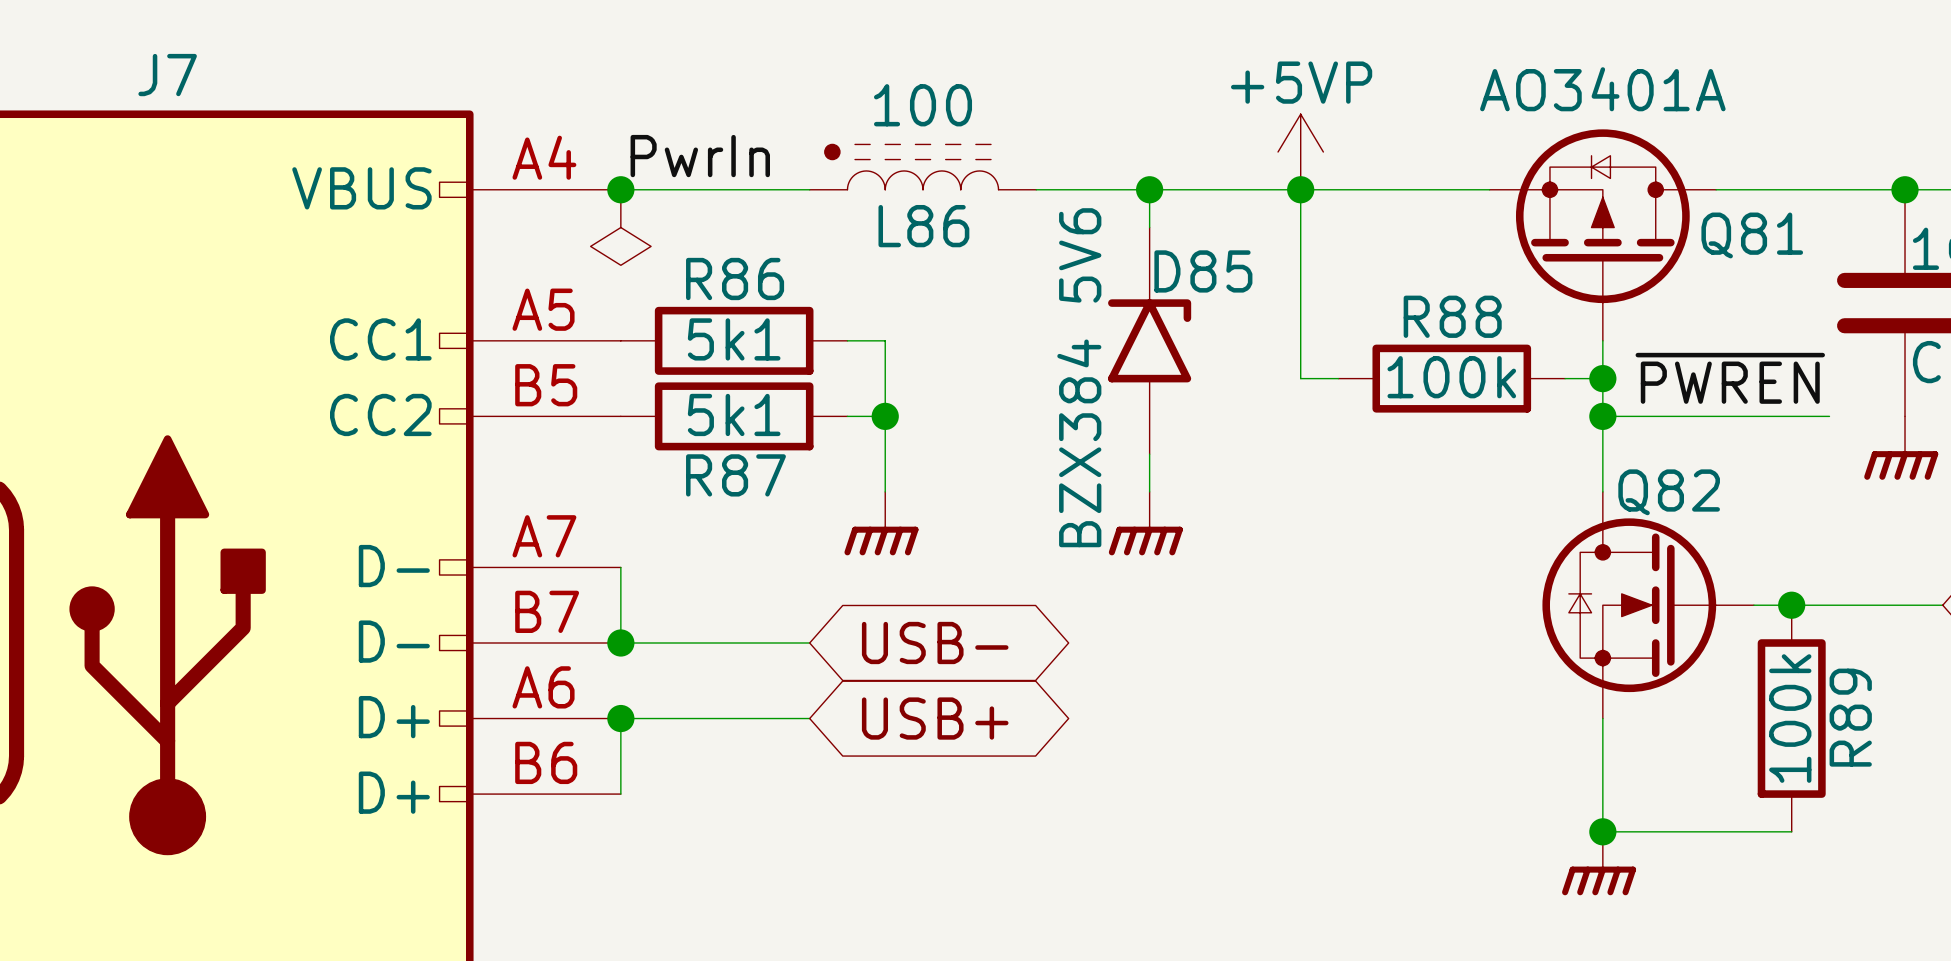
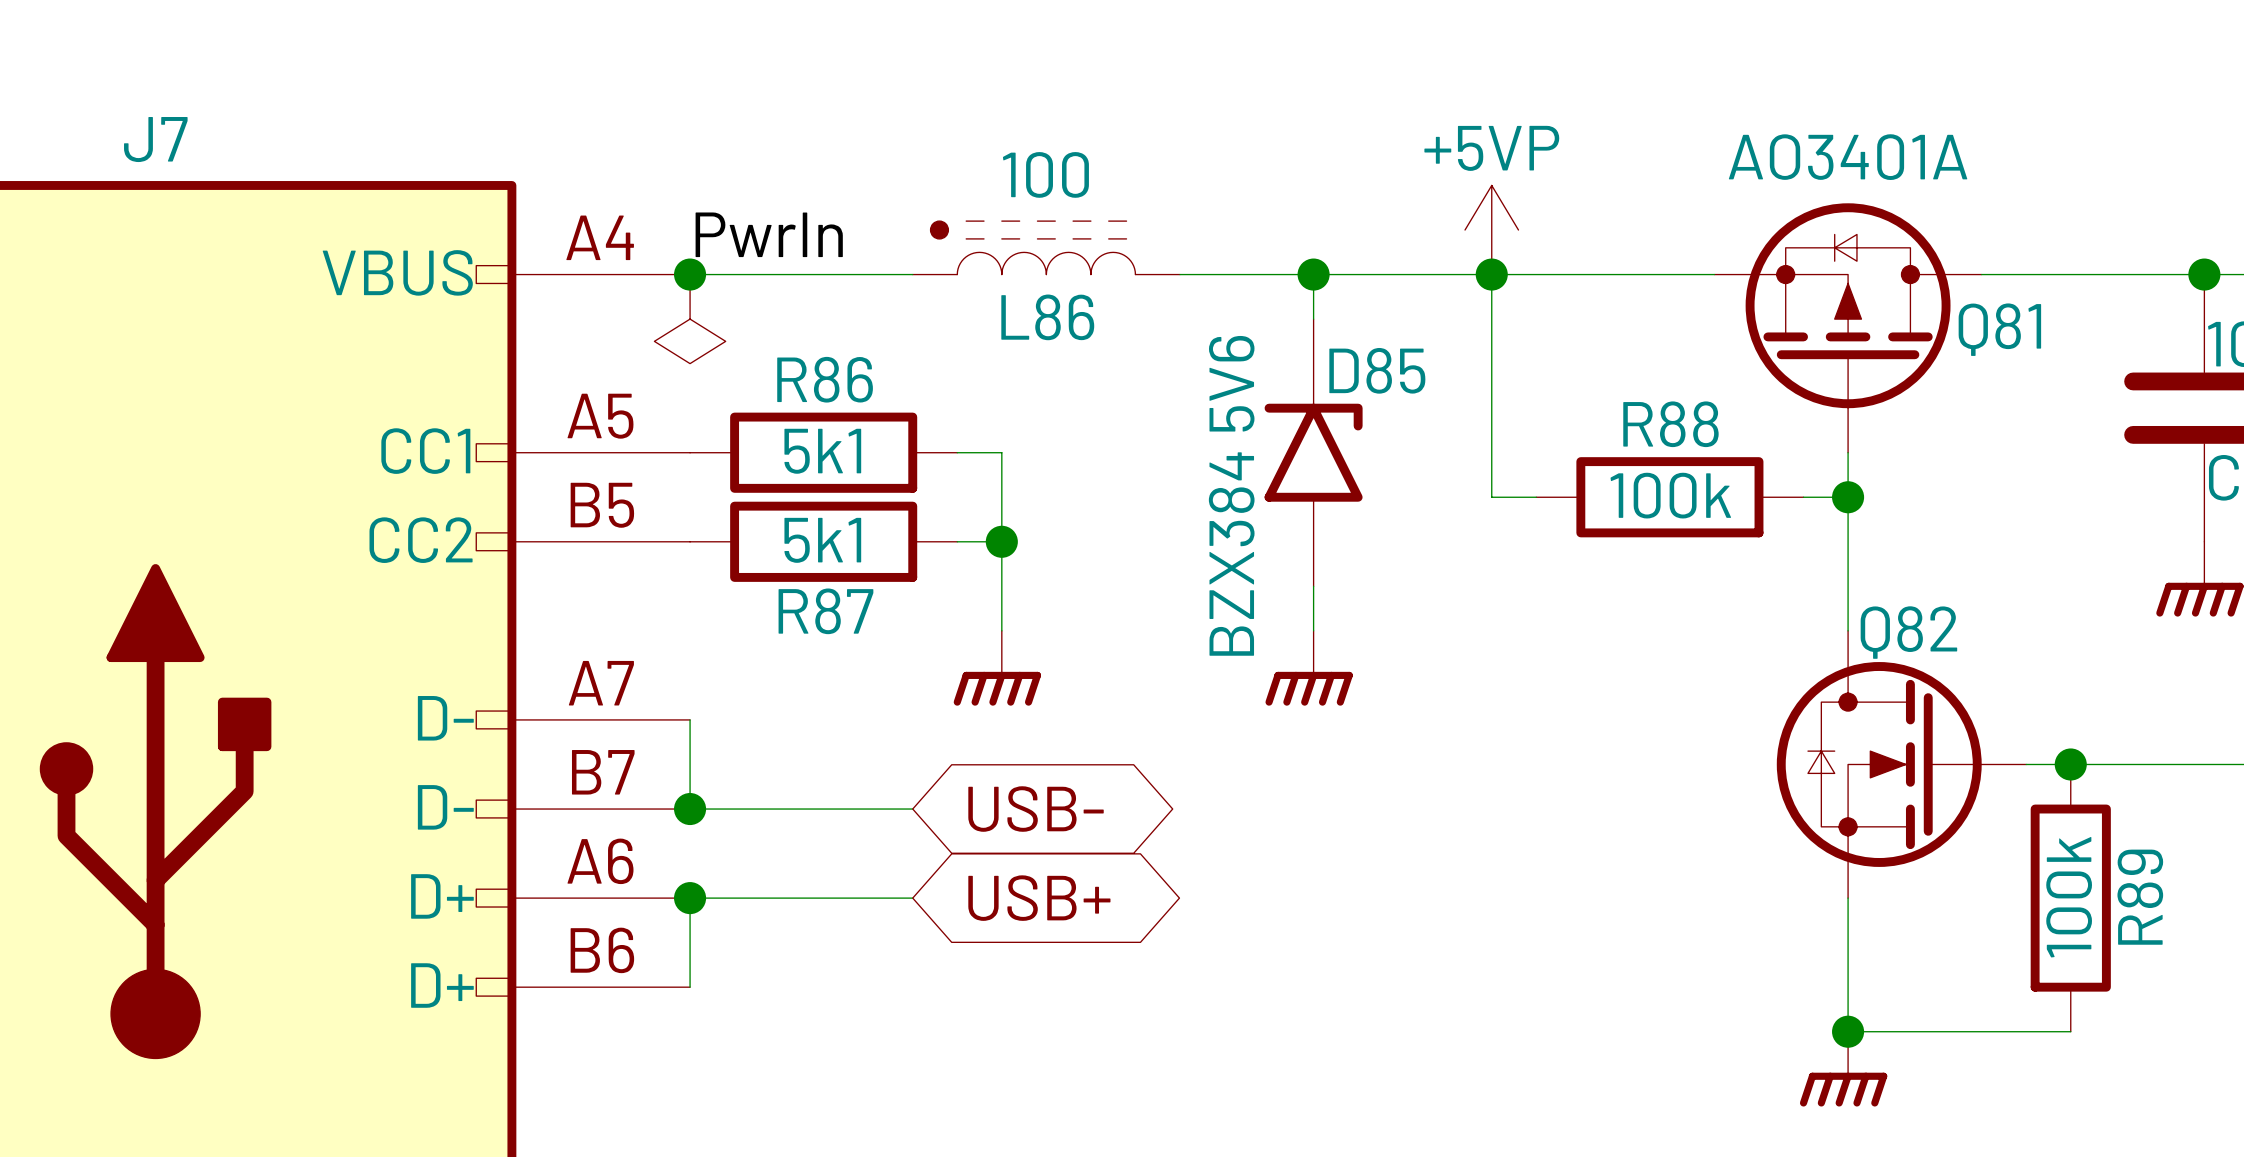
label: ~{PWREN} (1730, 378) -> none
wire: (1602, 416) (1829, 416) -> none
junction: (1602, 416) -> none

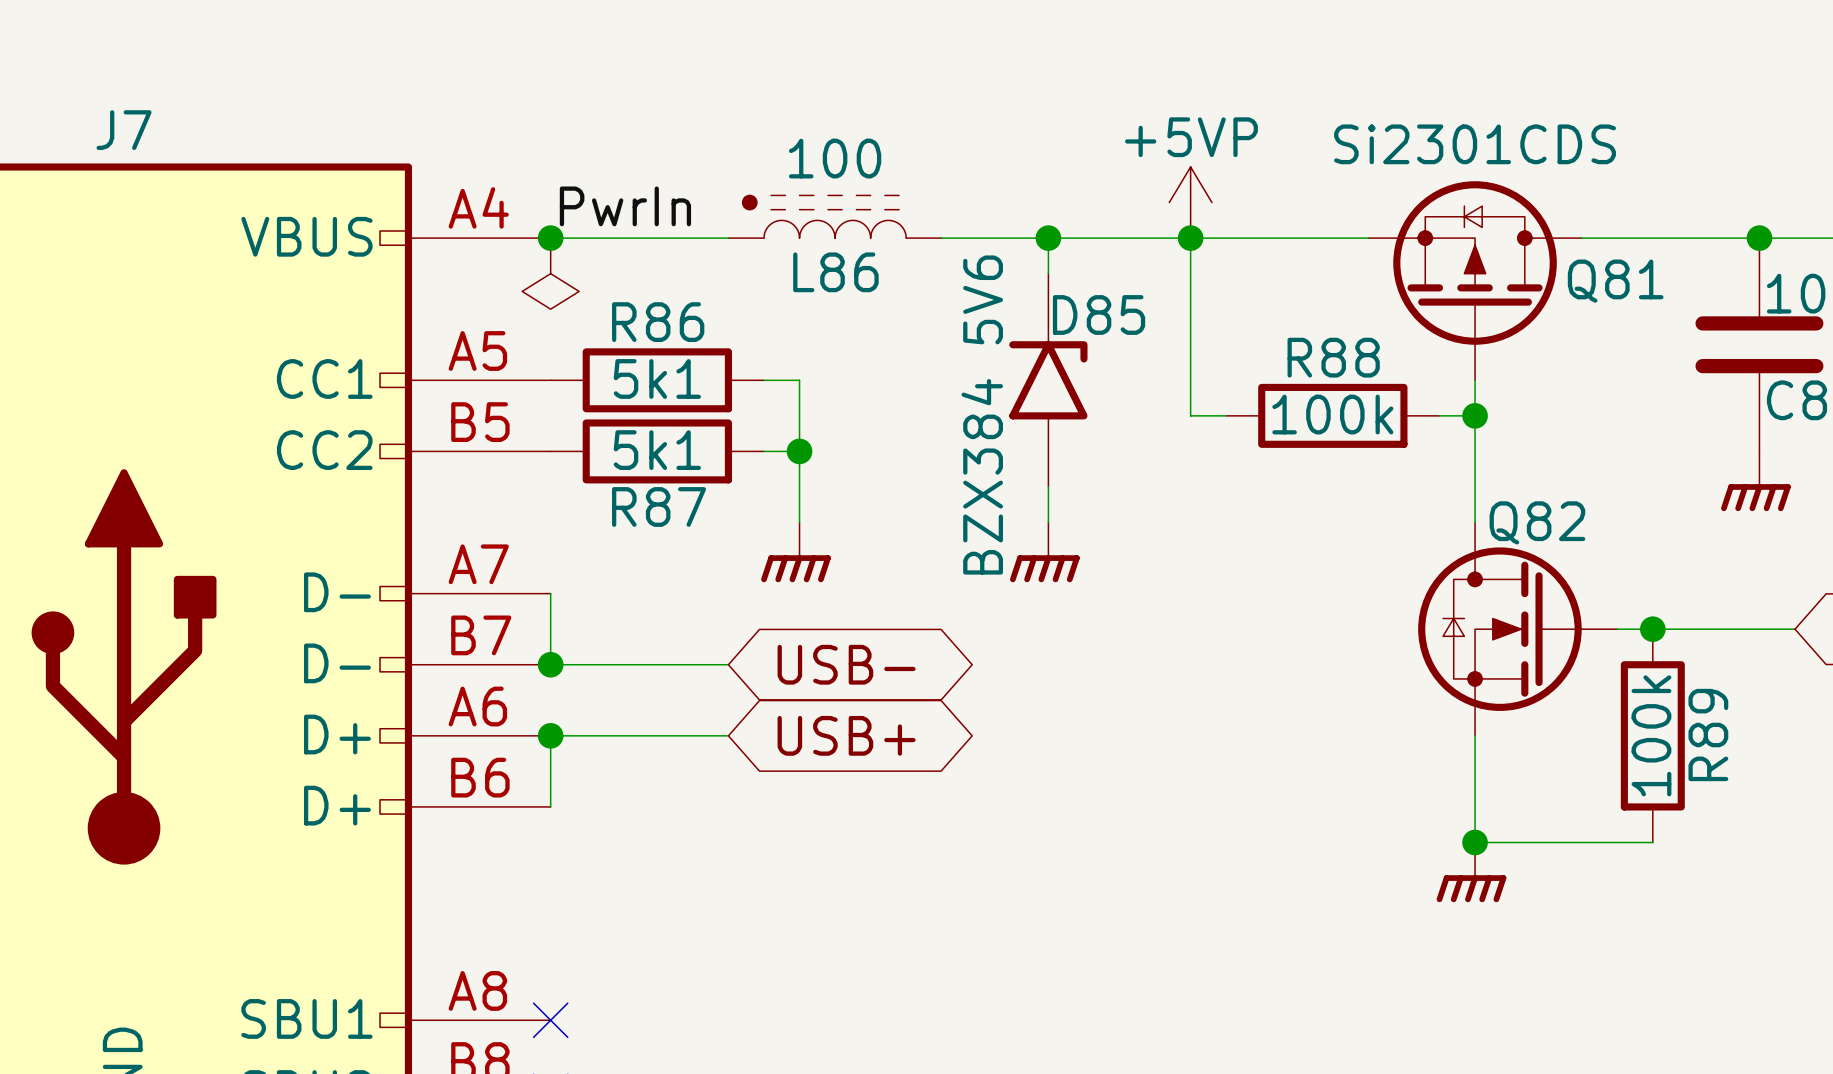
Q81 value: AO3401A (1848, 157) -> Si2301CDS (1475, 144)

